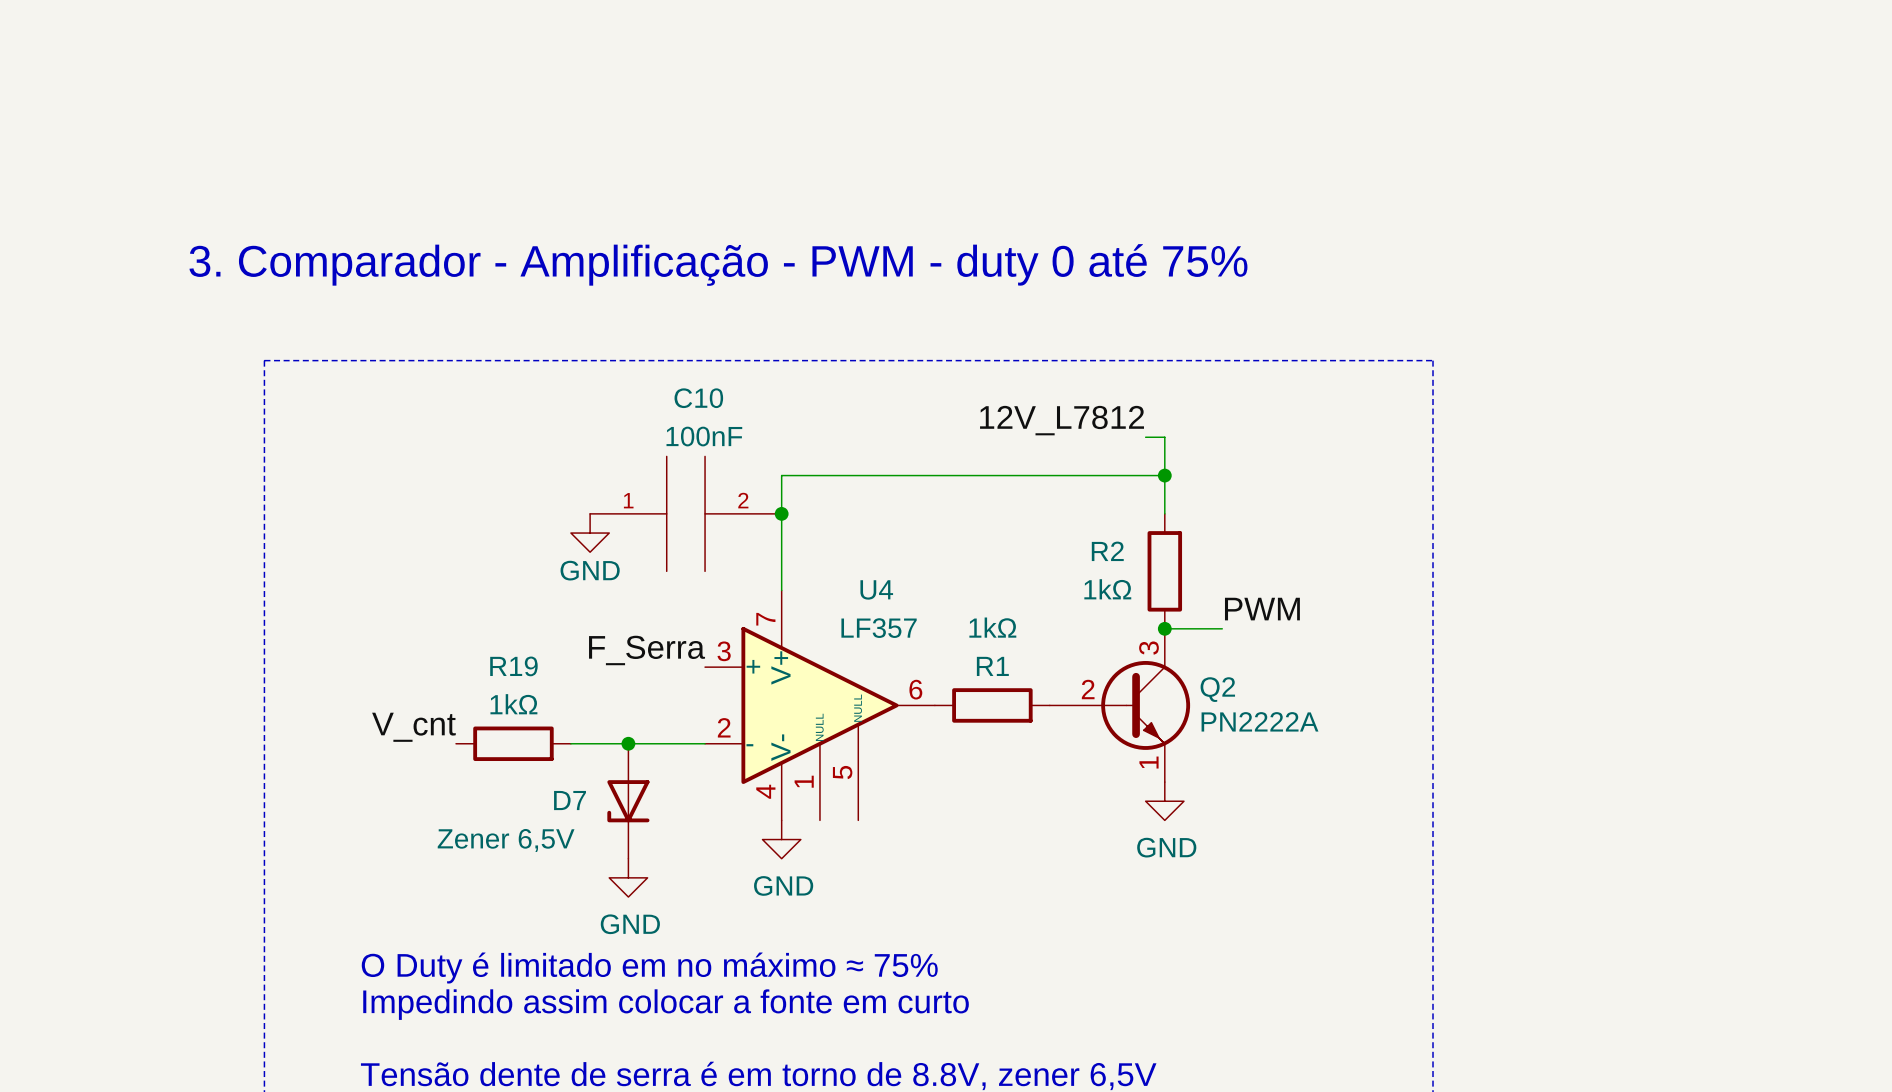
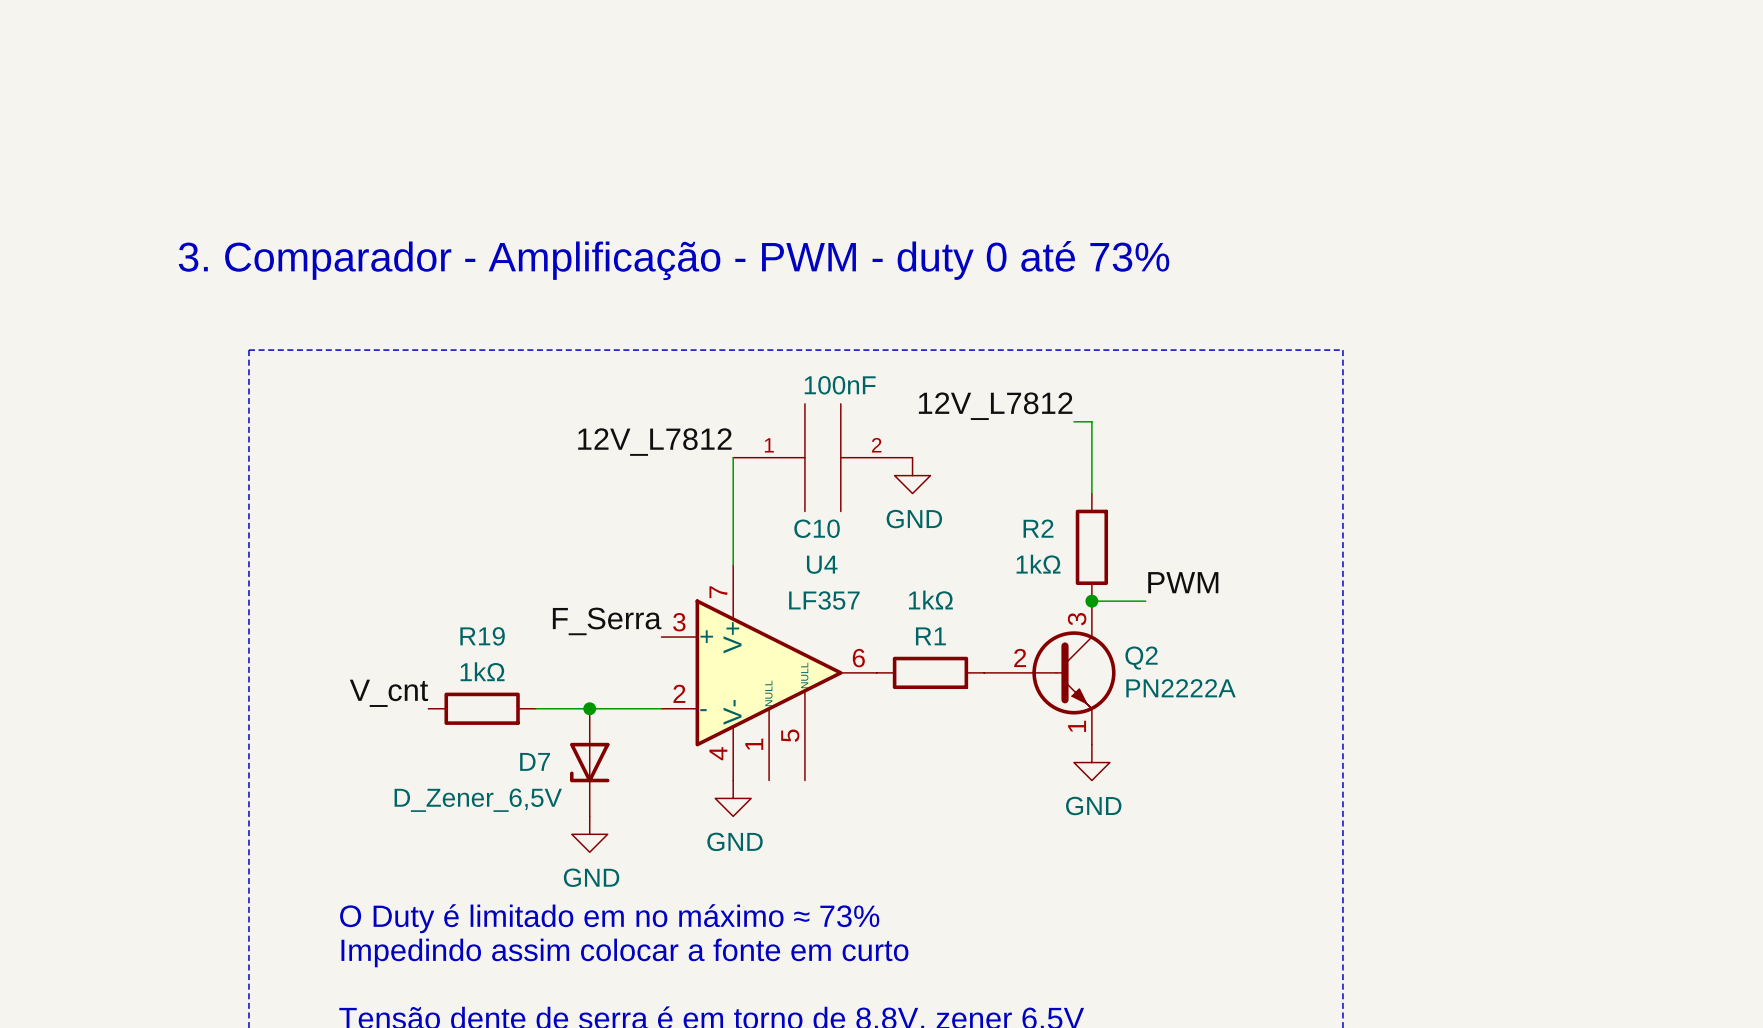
text: 3. Comparador - Amplificação - PWM - duty 0 até 75% (718, 264) -> 3. Comparador - Amplificação - PWM - duty 0 até 73% (674, 260)
C10 name position: C10 (698, 398) -> C10 (817, 528)
label: none -> 12V_L7812 (654, 442)
wire: (781, 475) (1164, 475) -> none
junction: (1164, 475) -> none
power symbol: none -> GND (912, 475)
C10 position: (685, 513) -> (822, 457)
junction: (781, 513) -> none
power symbol: GND (590, 533) -> none
D7 value: Zener 6,5V (506, 840) -> D_Zener_6,5V (478, 800)
text: O Duty é limitado em no máximo ≈ 75% (649, 968) -> O Duty é limitado em no máximo ≈ 73% (609, 918)

